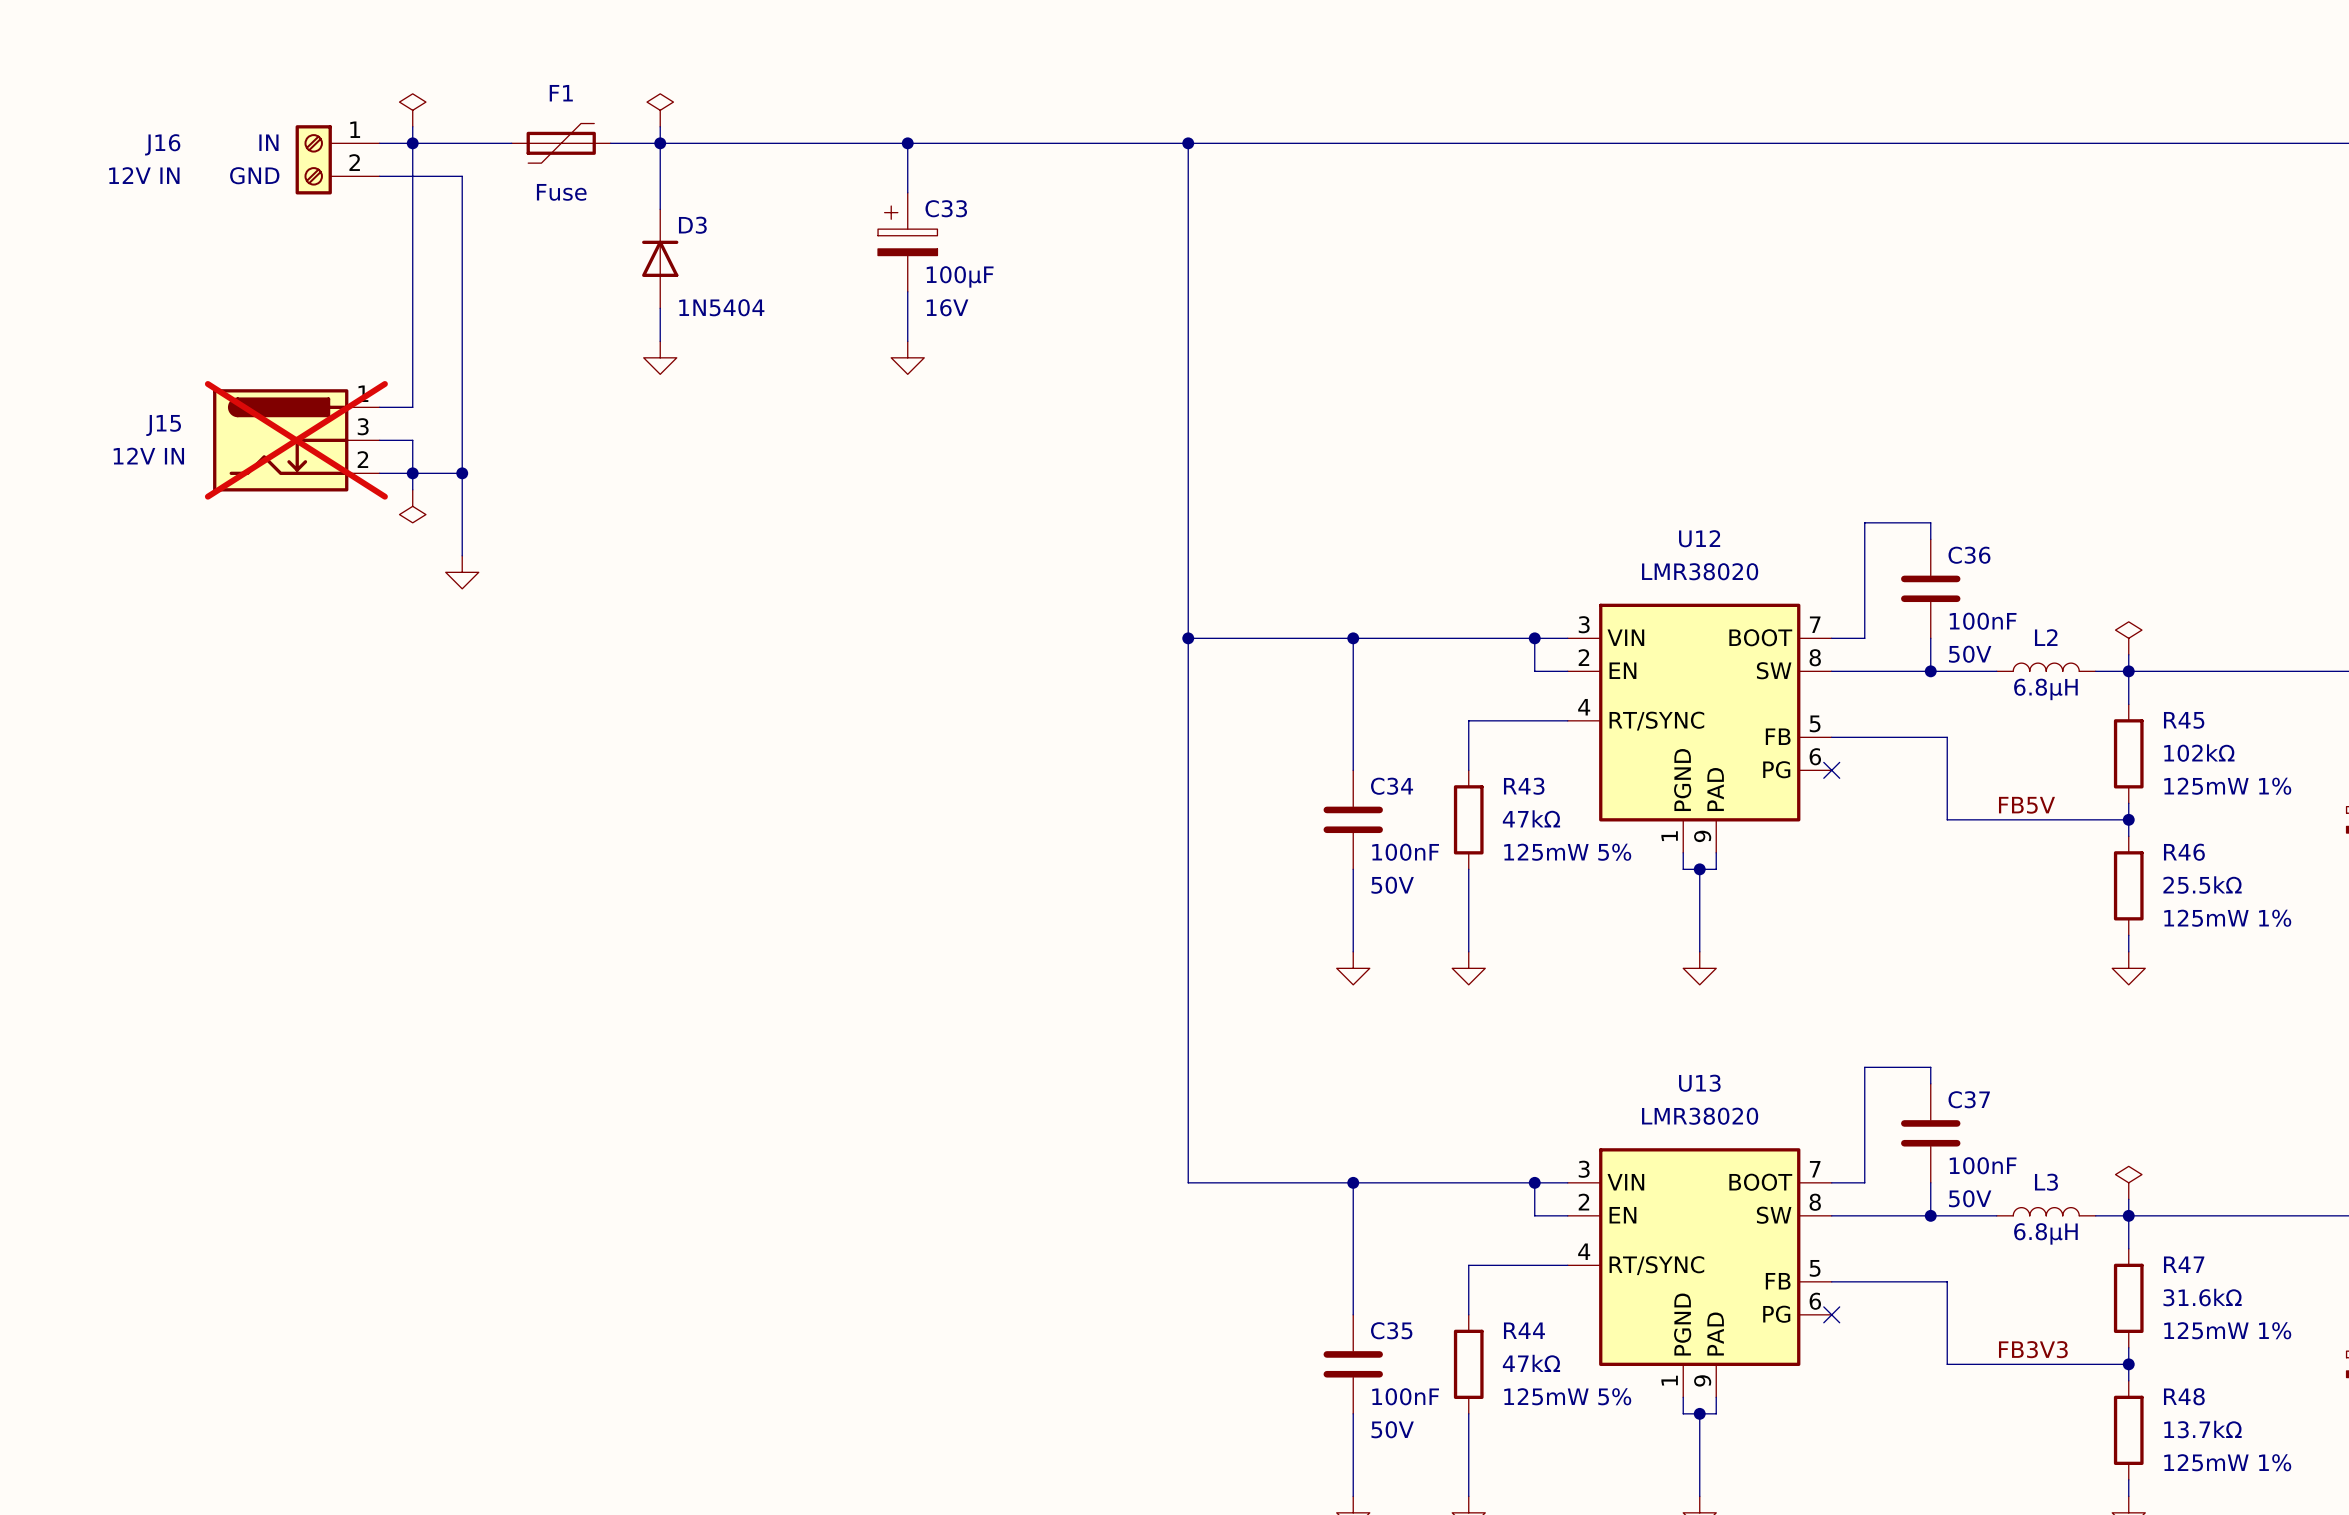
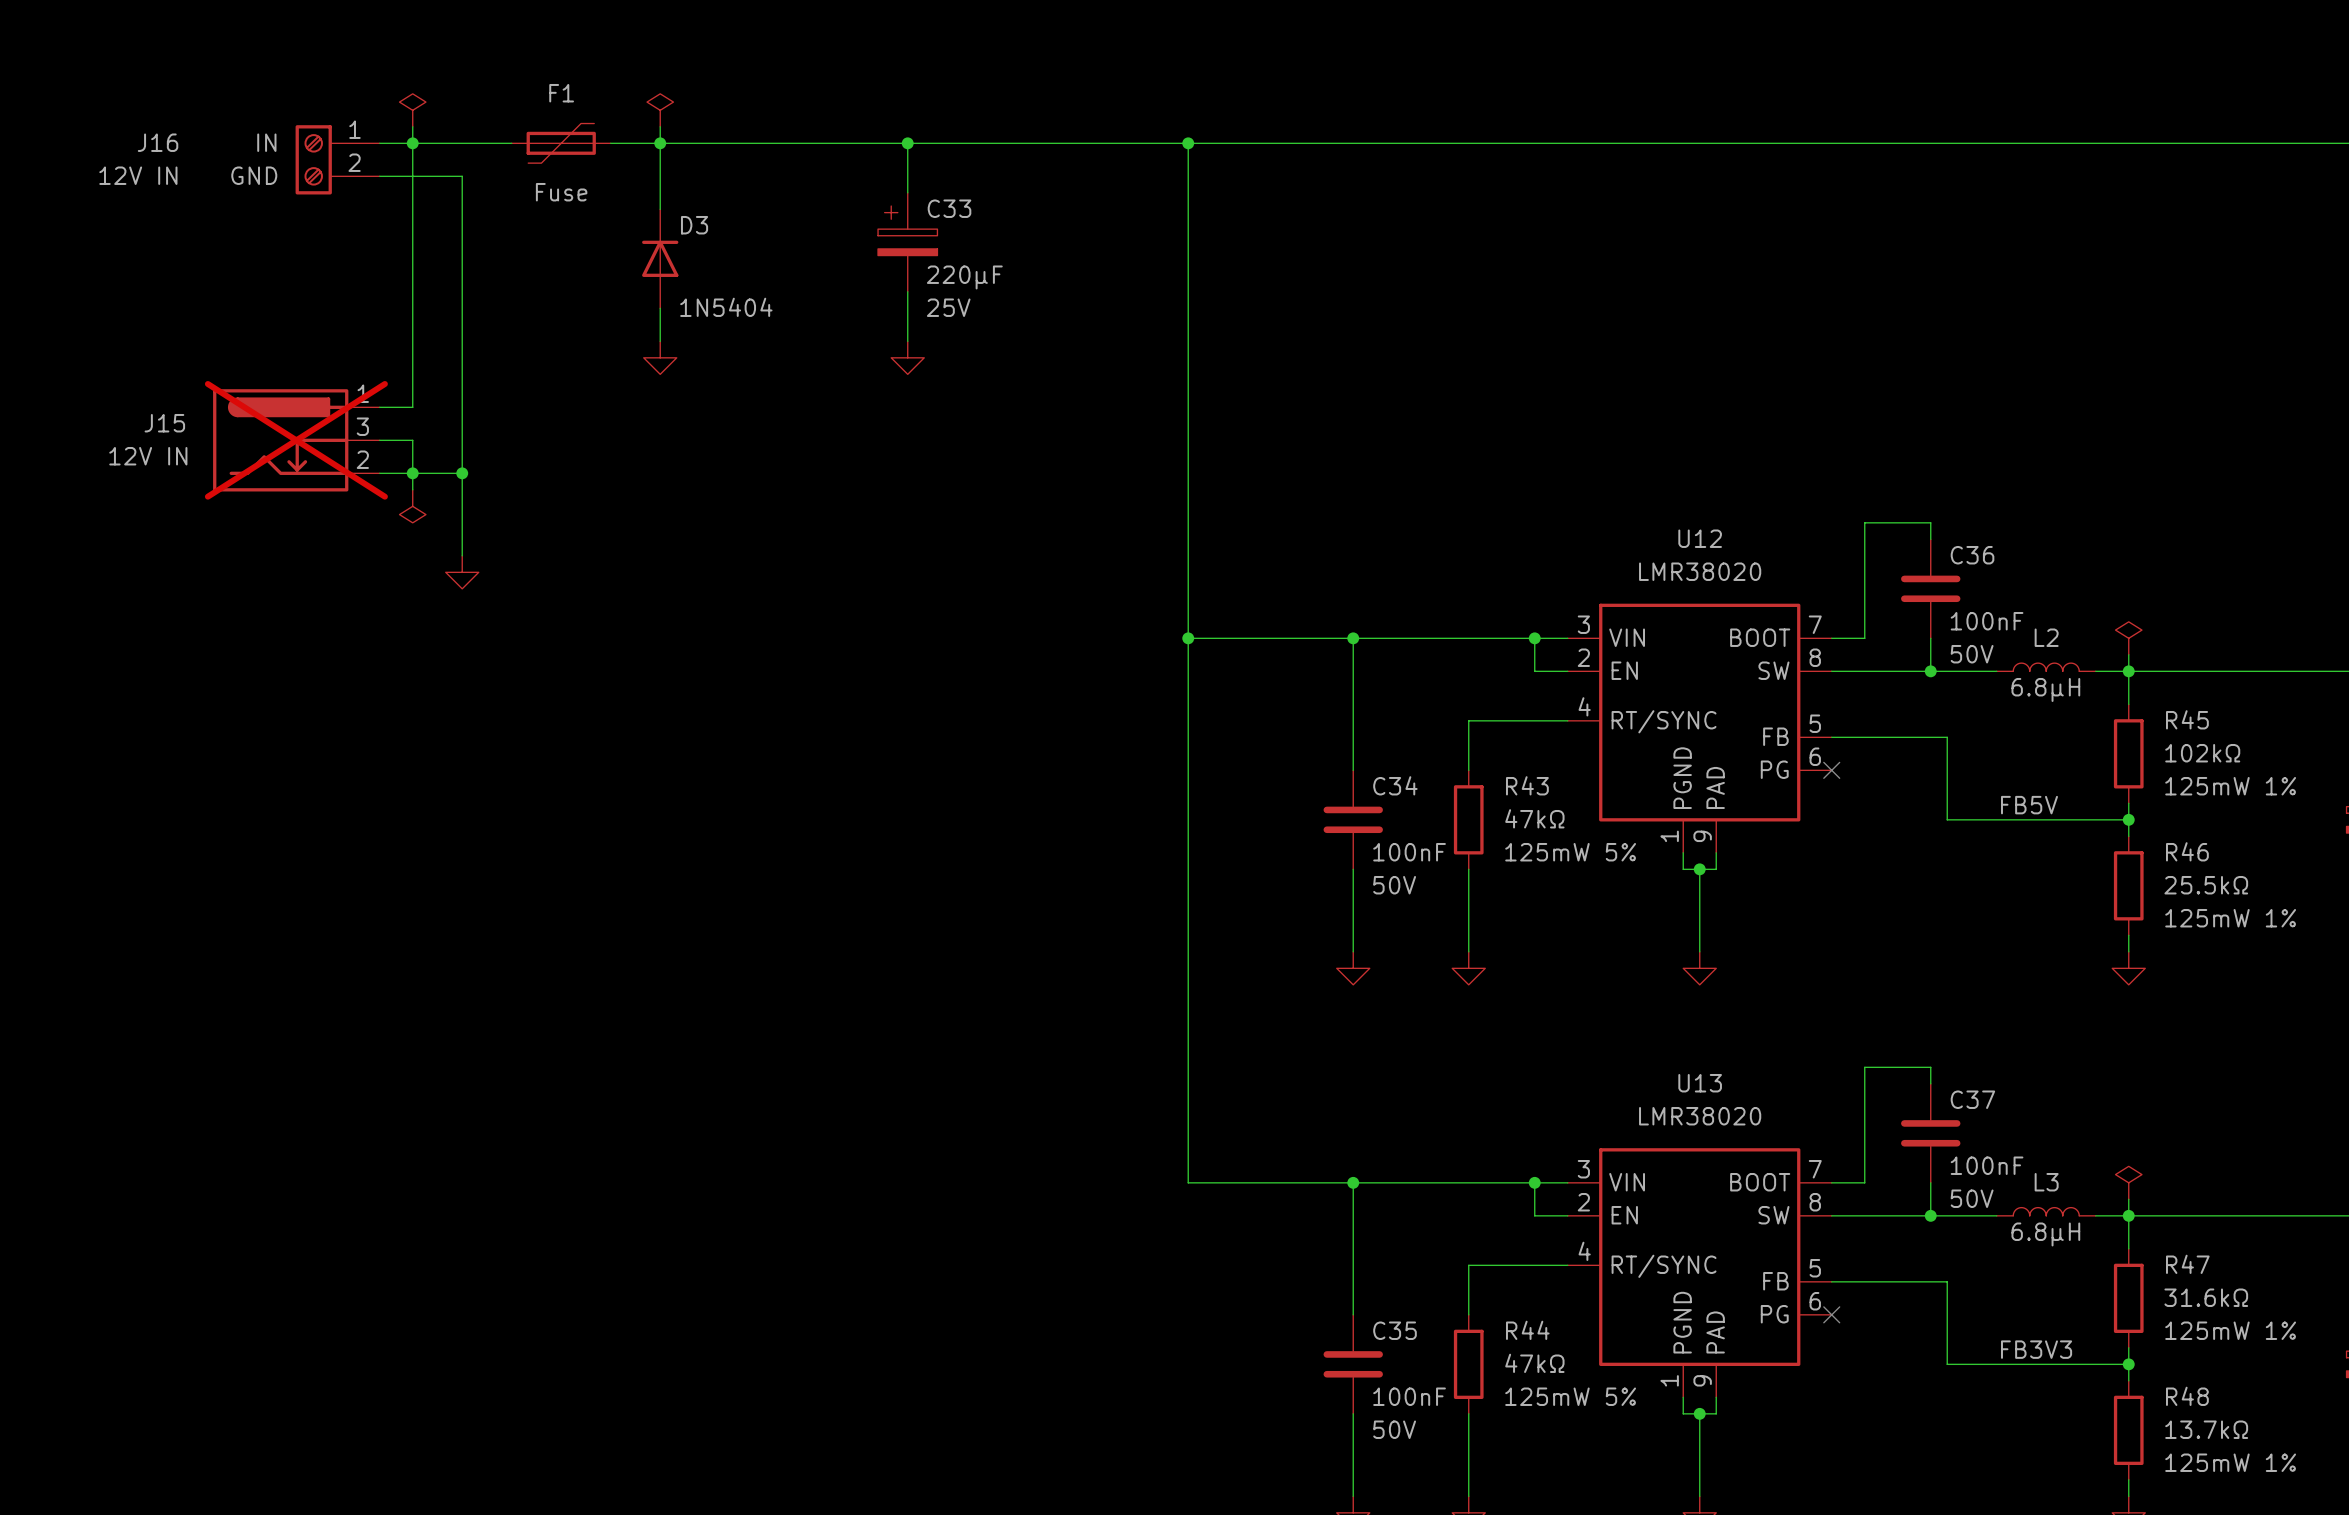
C33 value: 100μF (960, 276) -> 220μF (964, 277)
C33 text: 16V (947, 307) -> 25V (948, 307)

